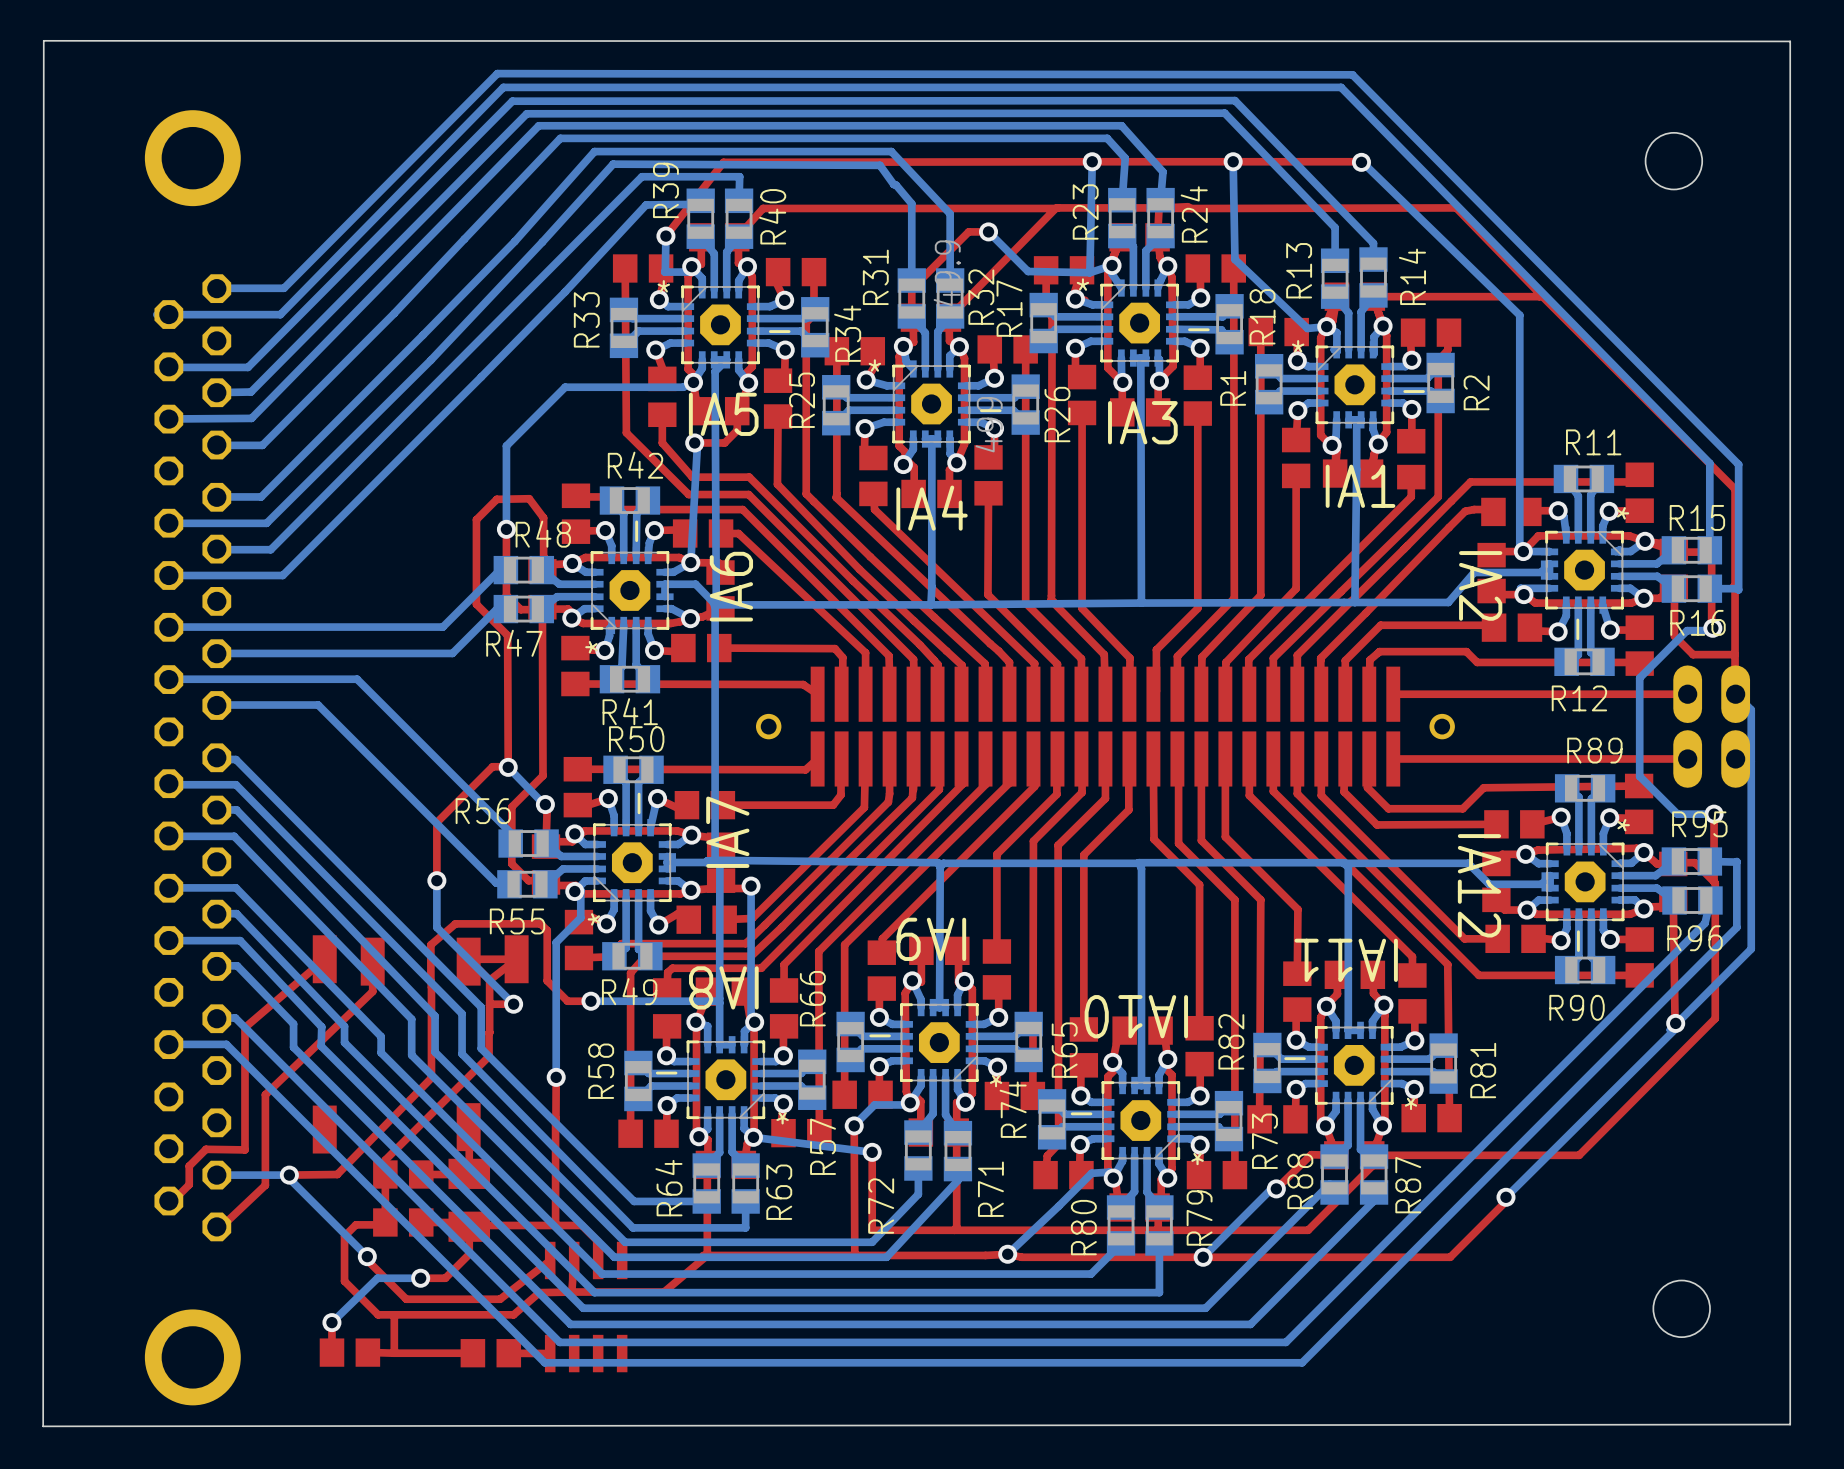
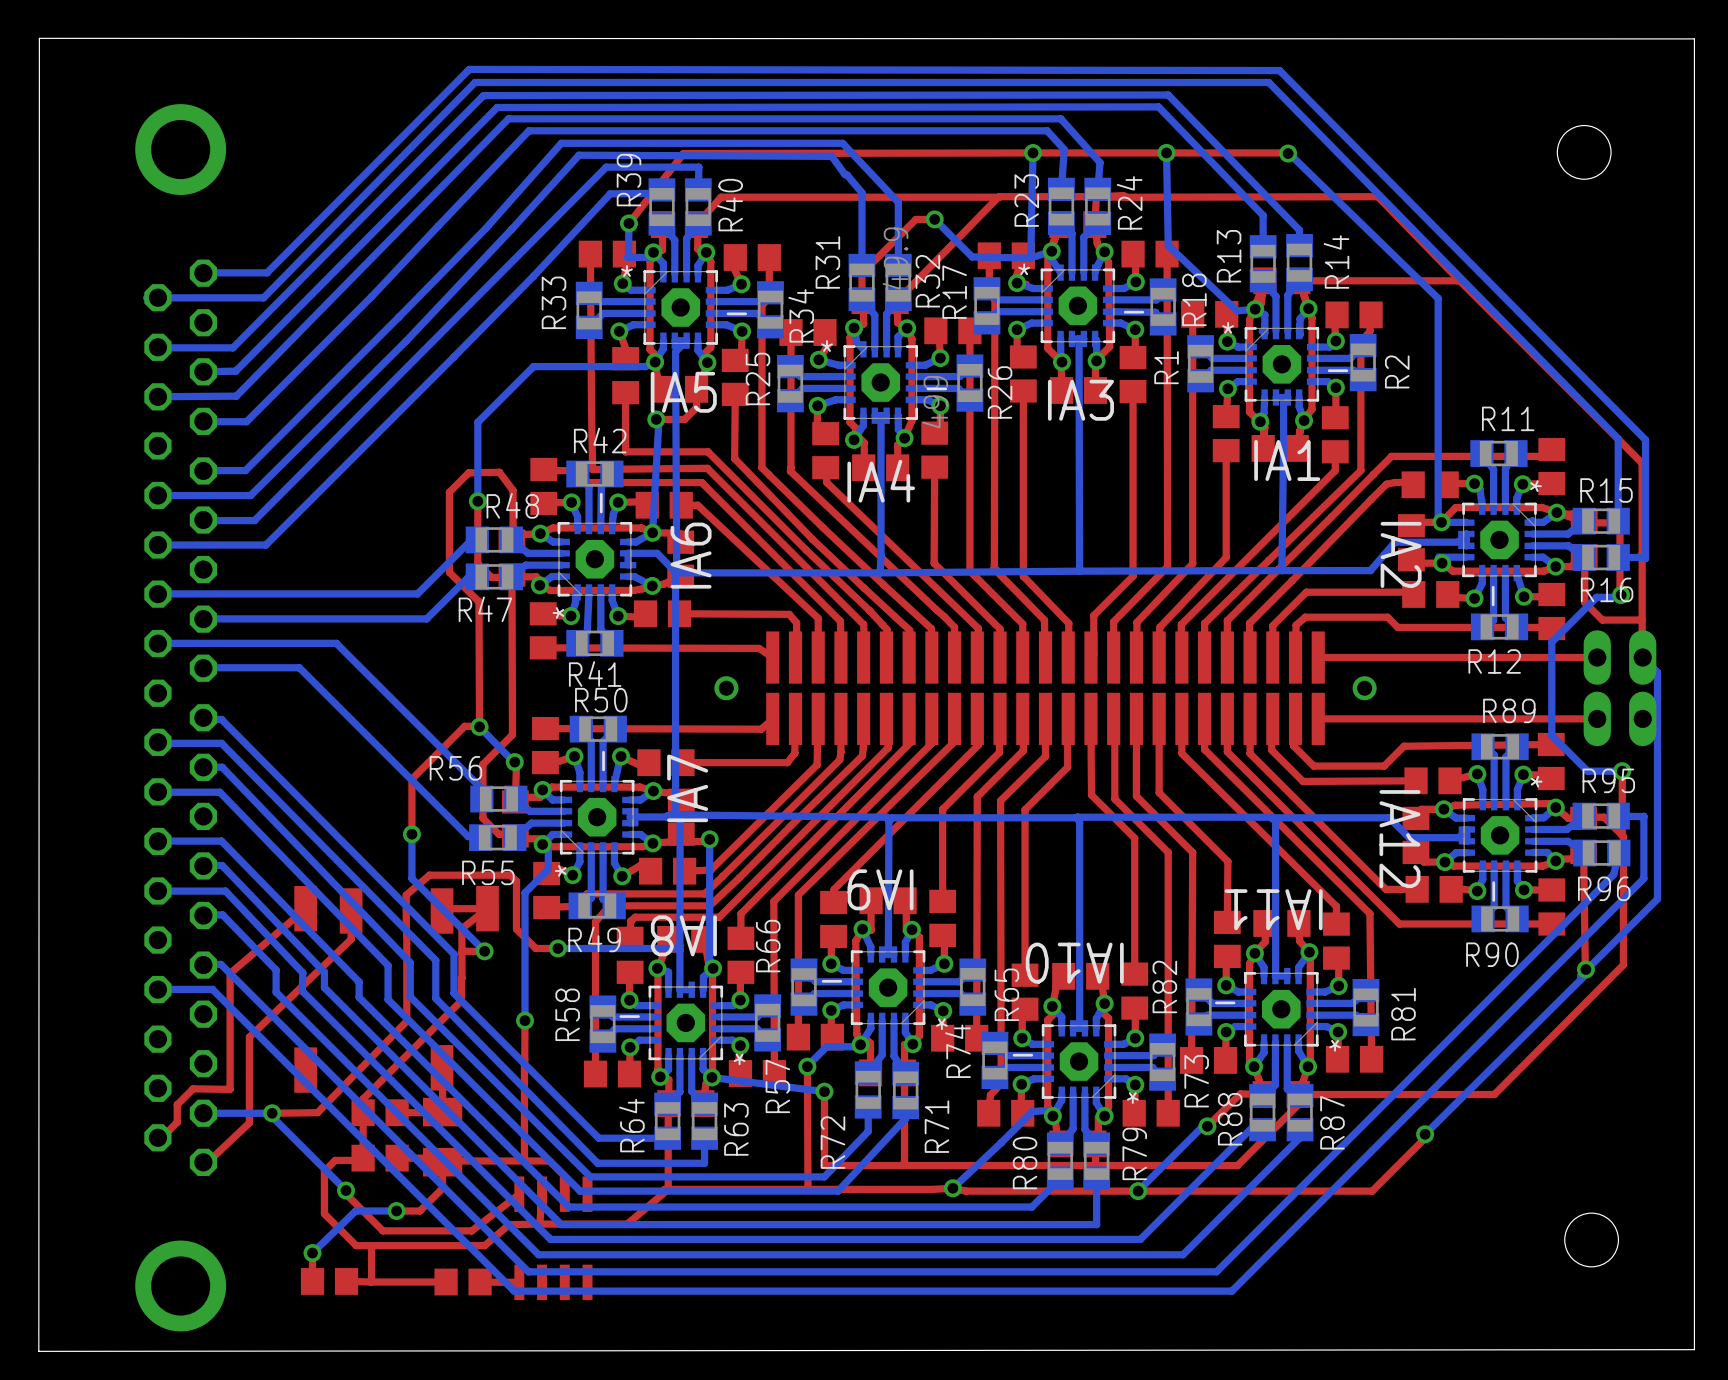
top track: (626, 432) (688, 494) (748, 494) -> (591, 409) (592, 469) (707, 468)
top track: (662, 442) (692, 477) -> (625, 419) (625, 451) (654, 451)

